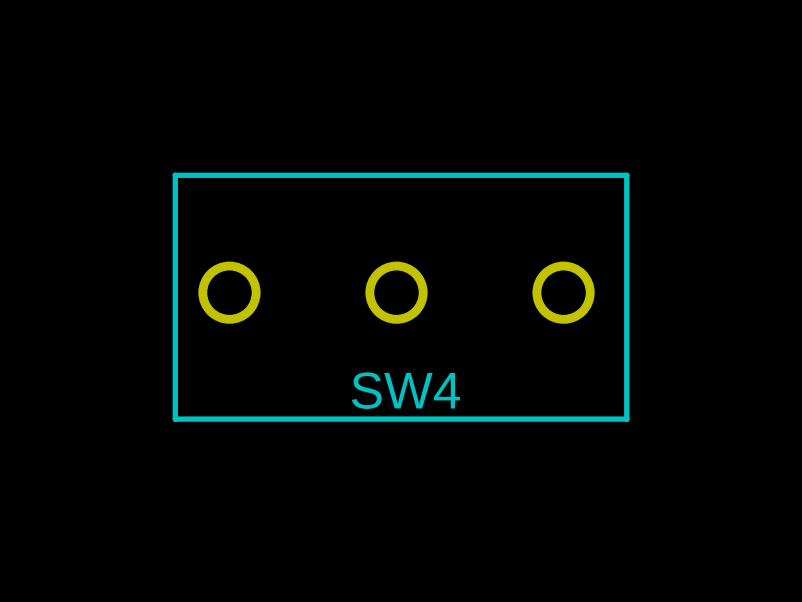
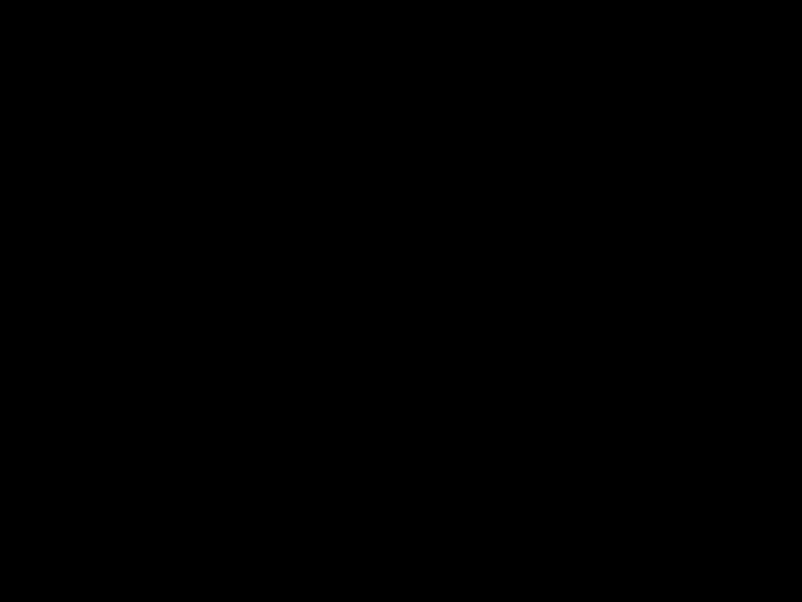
SW4: (401, 297) -> none

